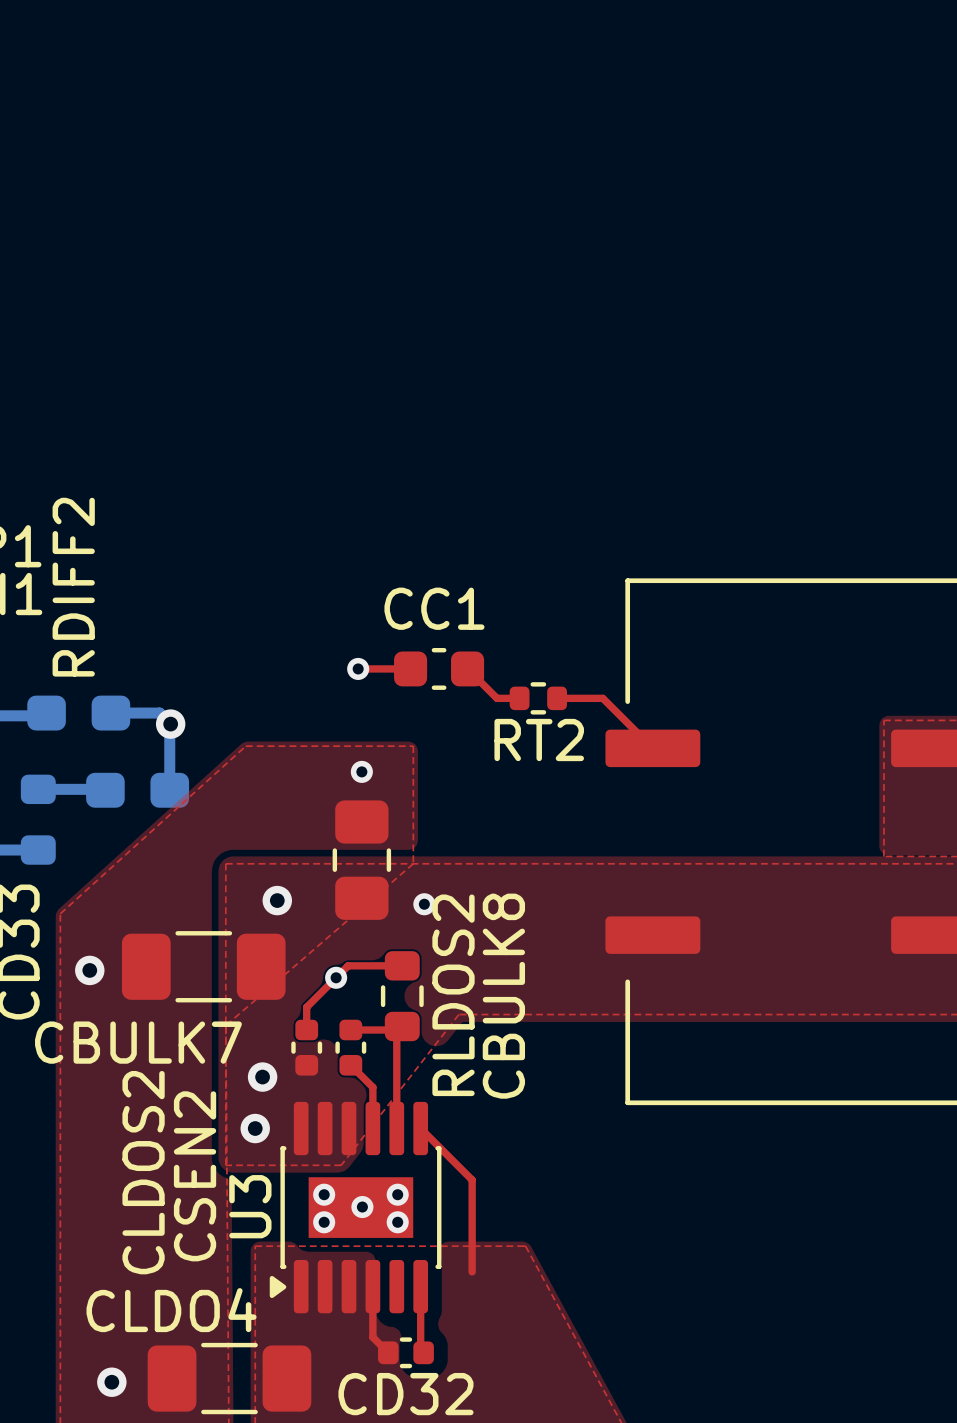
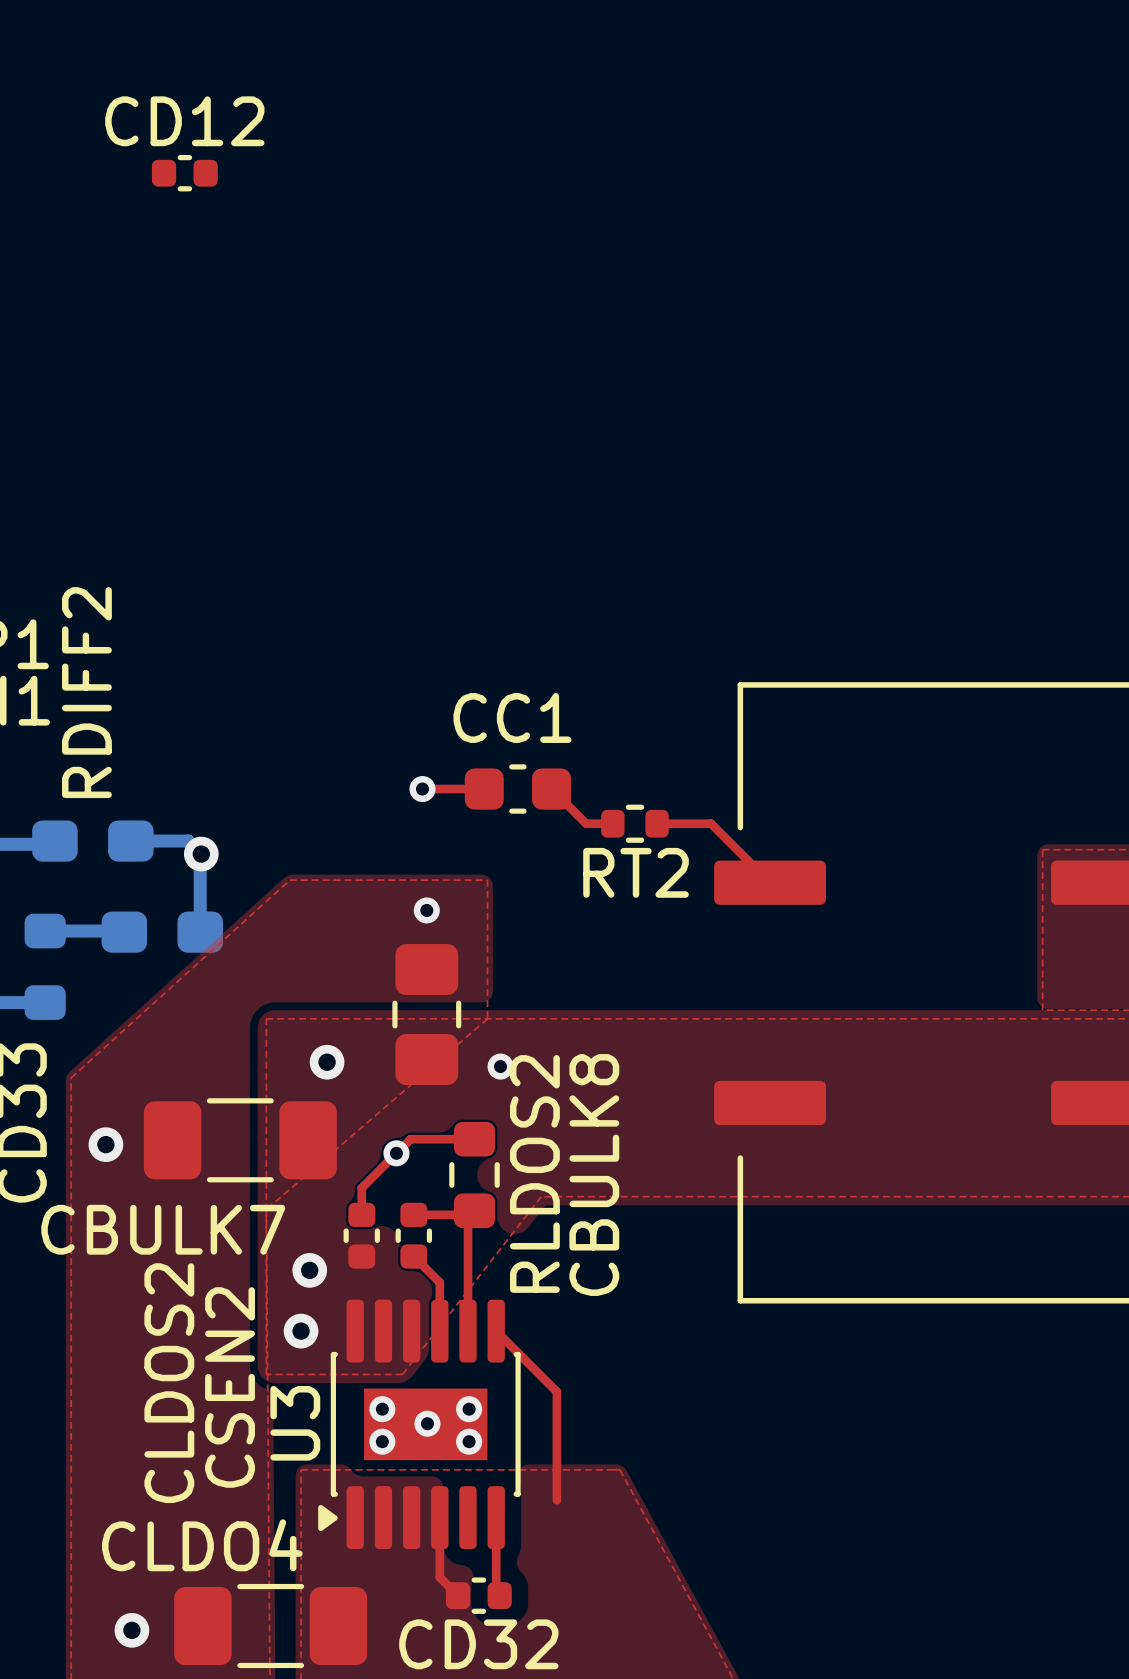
CD12: none -> (184, 173)

